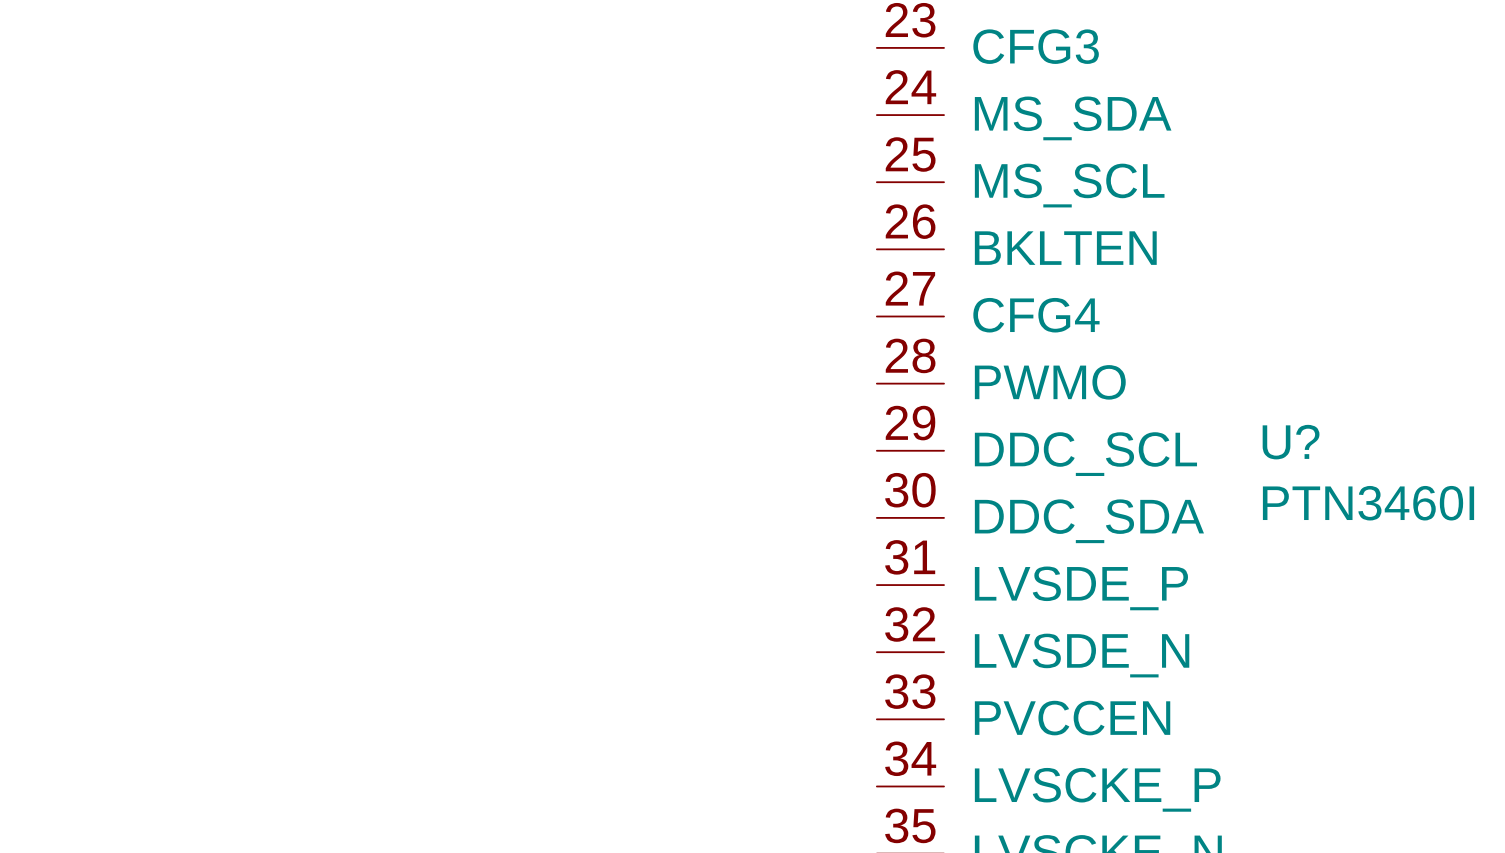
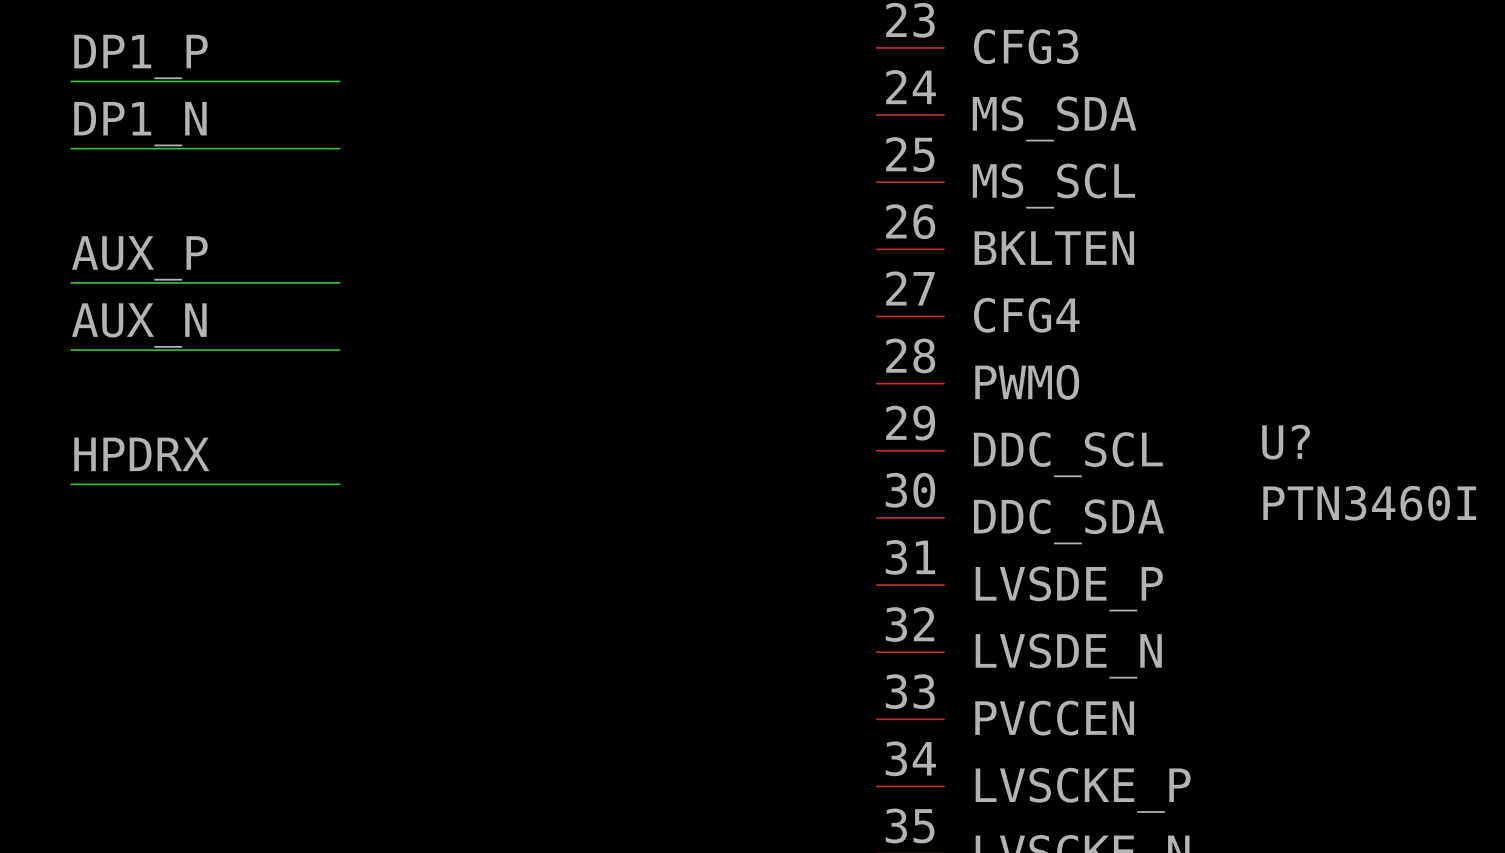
label: none -> DP1_P (140, 56)
wire: none -> (71, 81) (339, 81)
label: none -> DP1_N (140, 124)
wire: none -> (71, 148) (339, 148)
label: none -> AUX_P (139, 258)
wire: none -> (71, 282) (339, 282)
label: none -> AUX_N (139, 325)
wire: none -> (71, 350) (339, 350)
label: none -> HPDRX (141, 454)
wire: none -> (71, 484) (339, 484)

